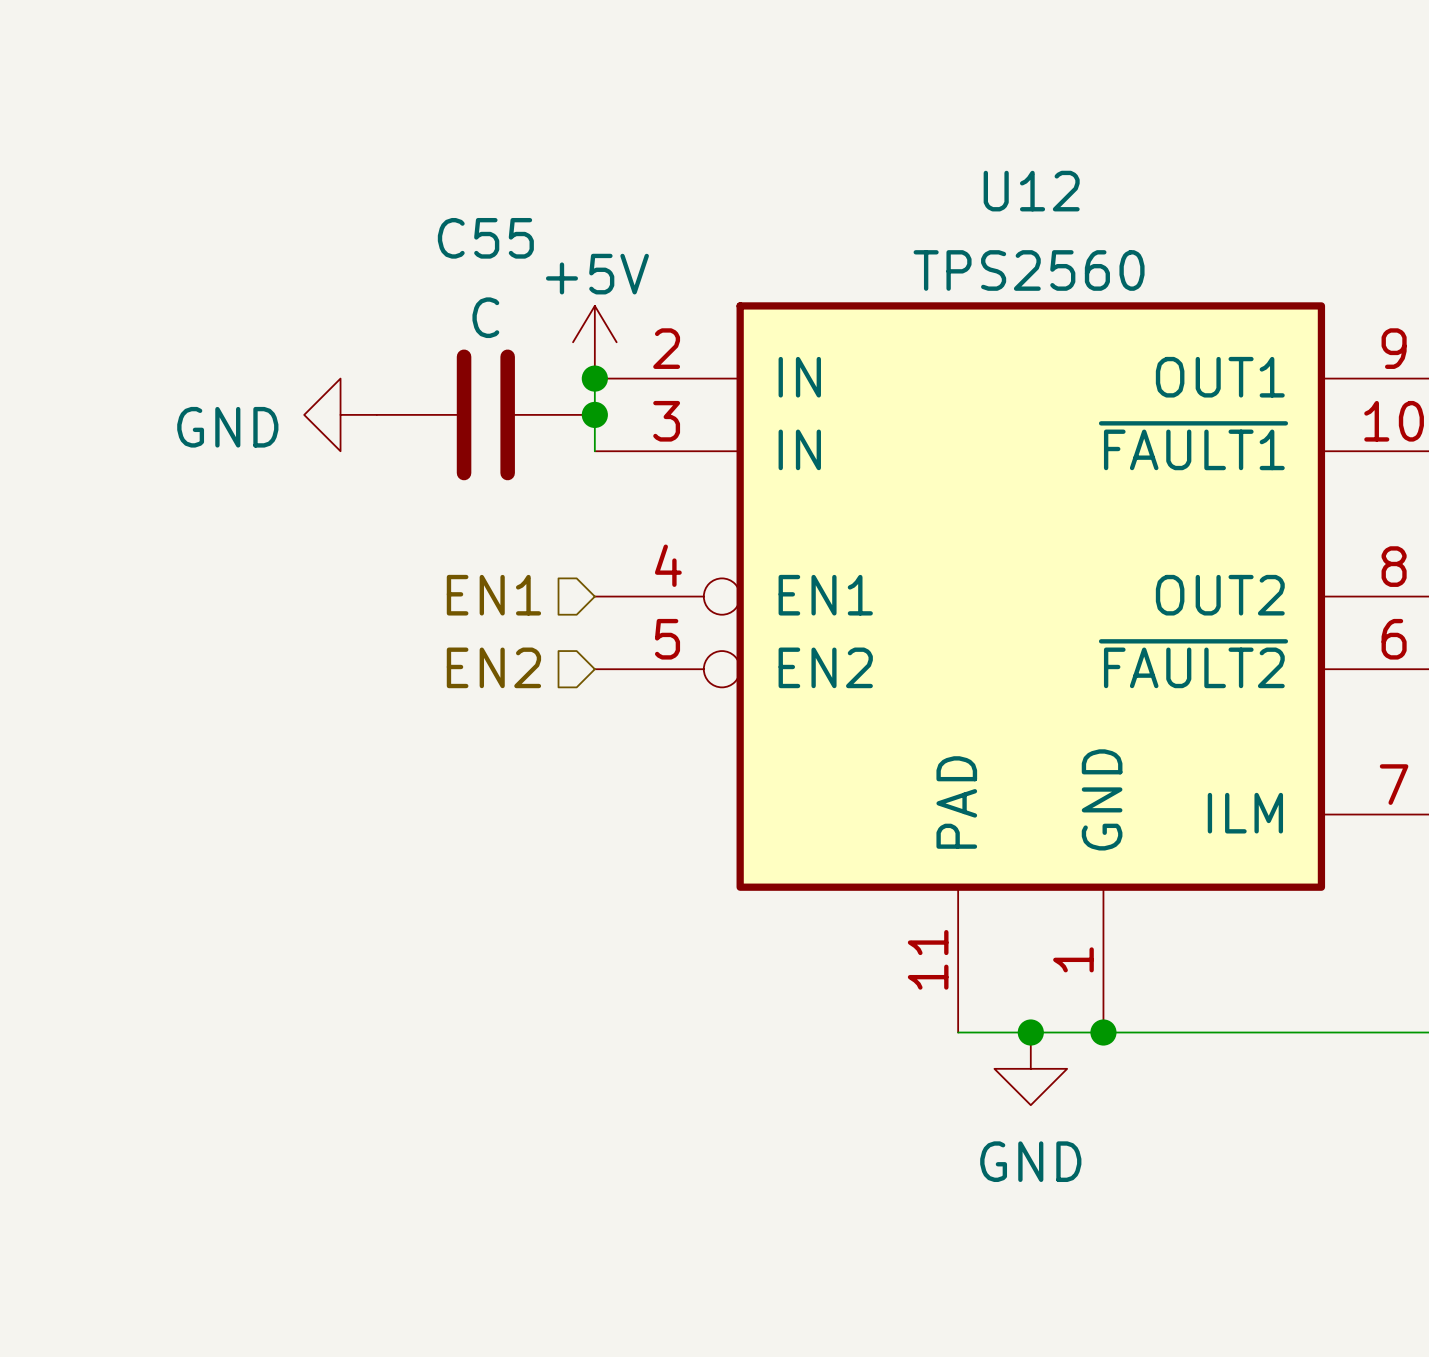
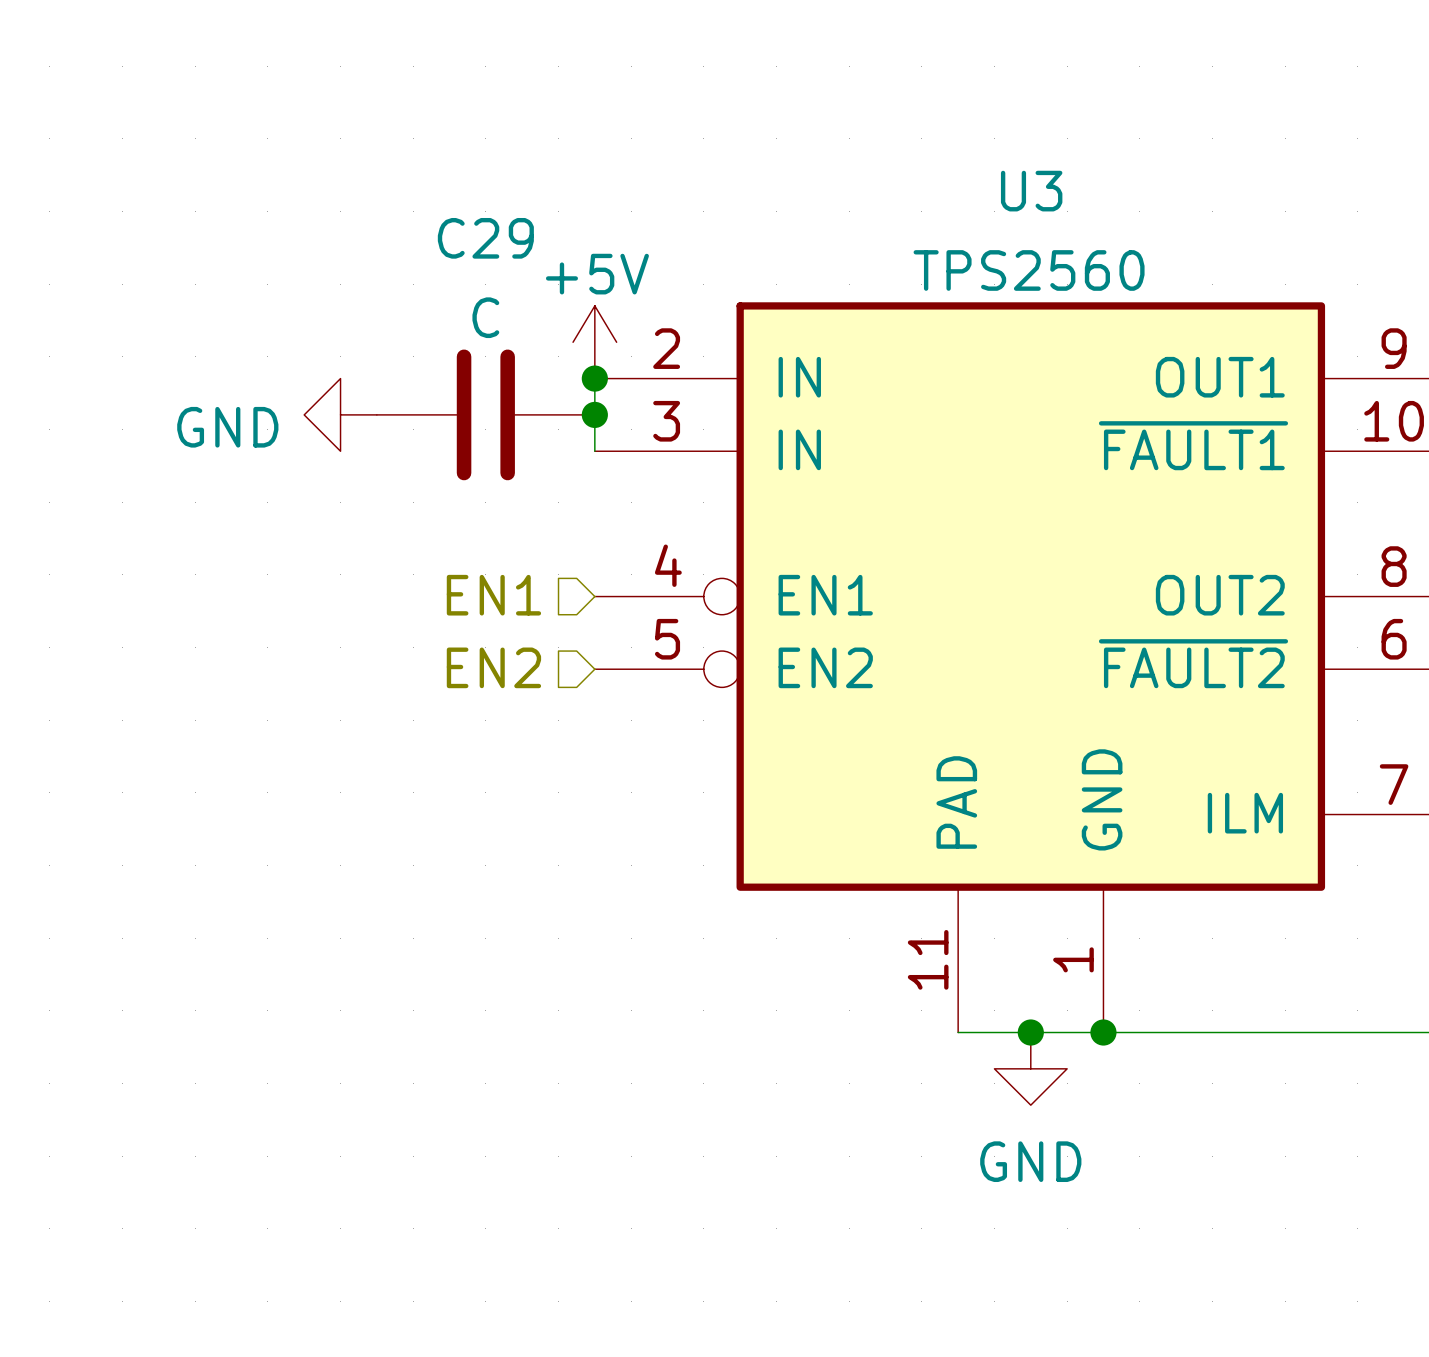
U12 name: U12 (1031, 191) -> U3 (1031, 191)
C55 name: C55 (485, 238) -> C29 (485, 238)

